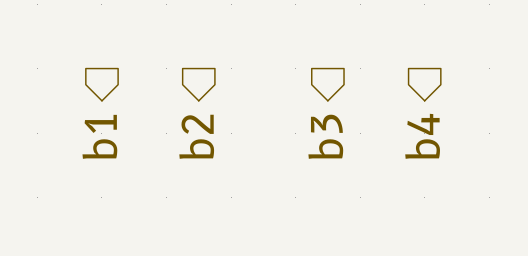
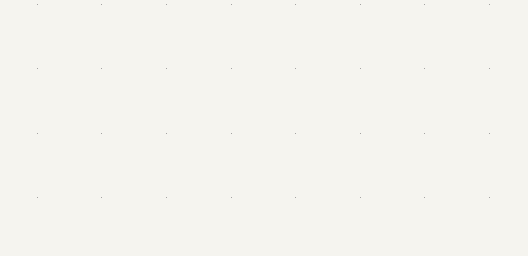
hierarchical label: b1 (99, 136) -> none
hierarchical label: b2 (196, 136) -> none
hierarchical label: b3 (325, 136) -> none
hierarchical label: b4 (422, 136) -> none

